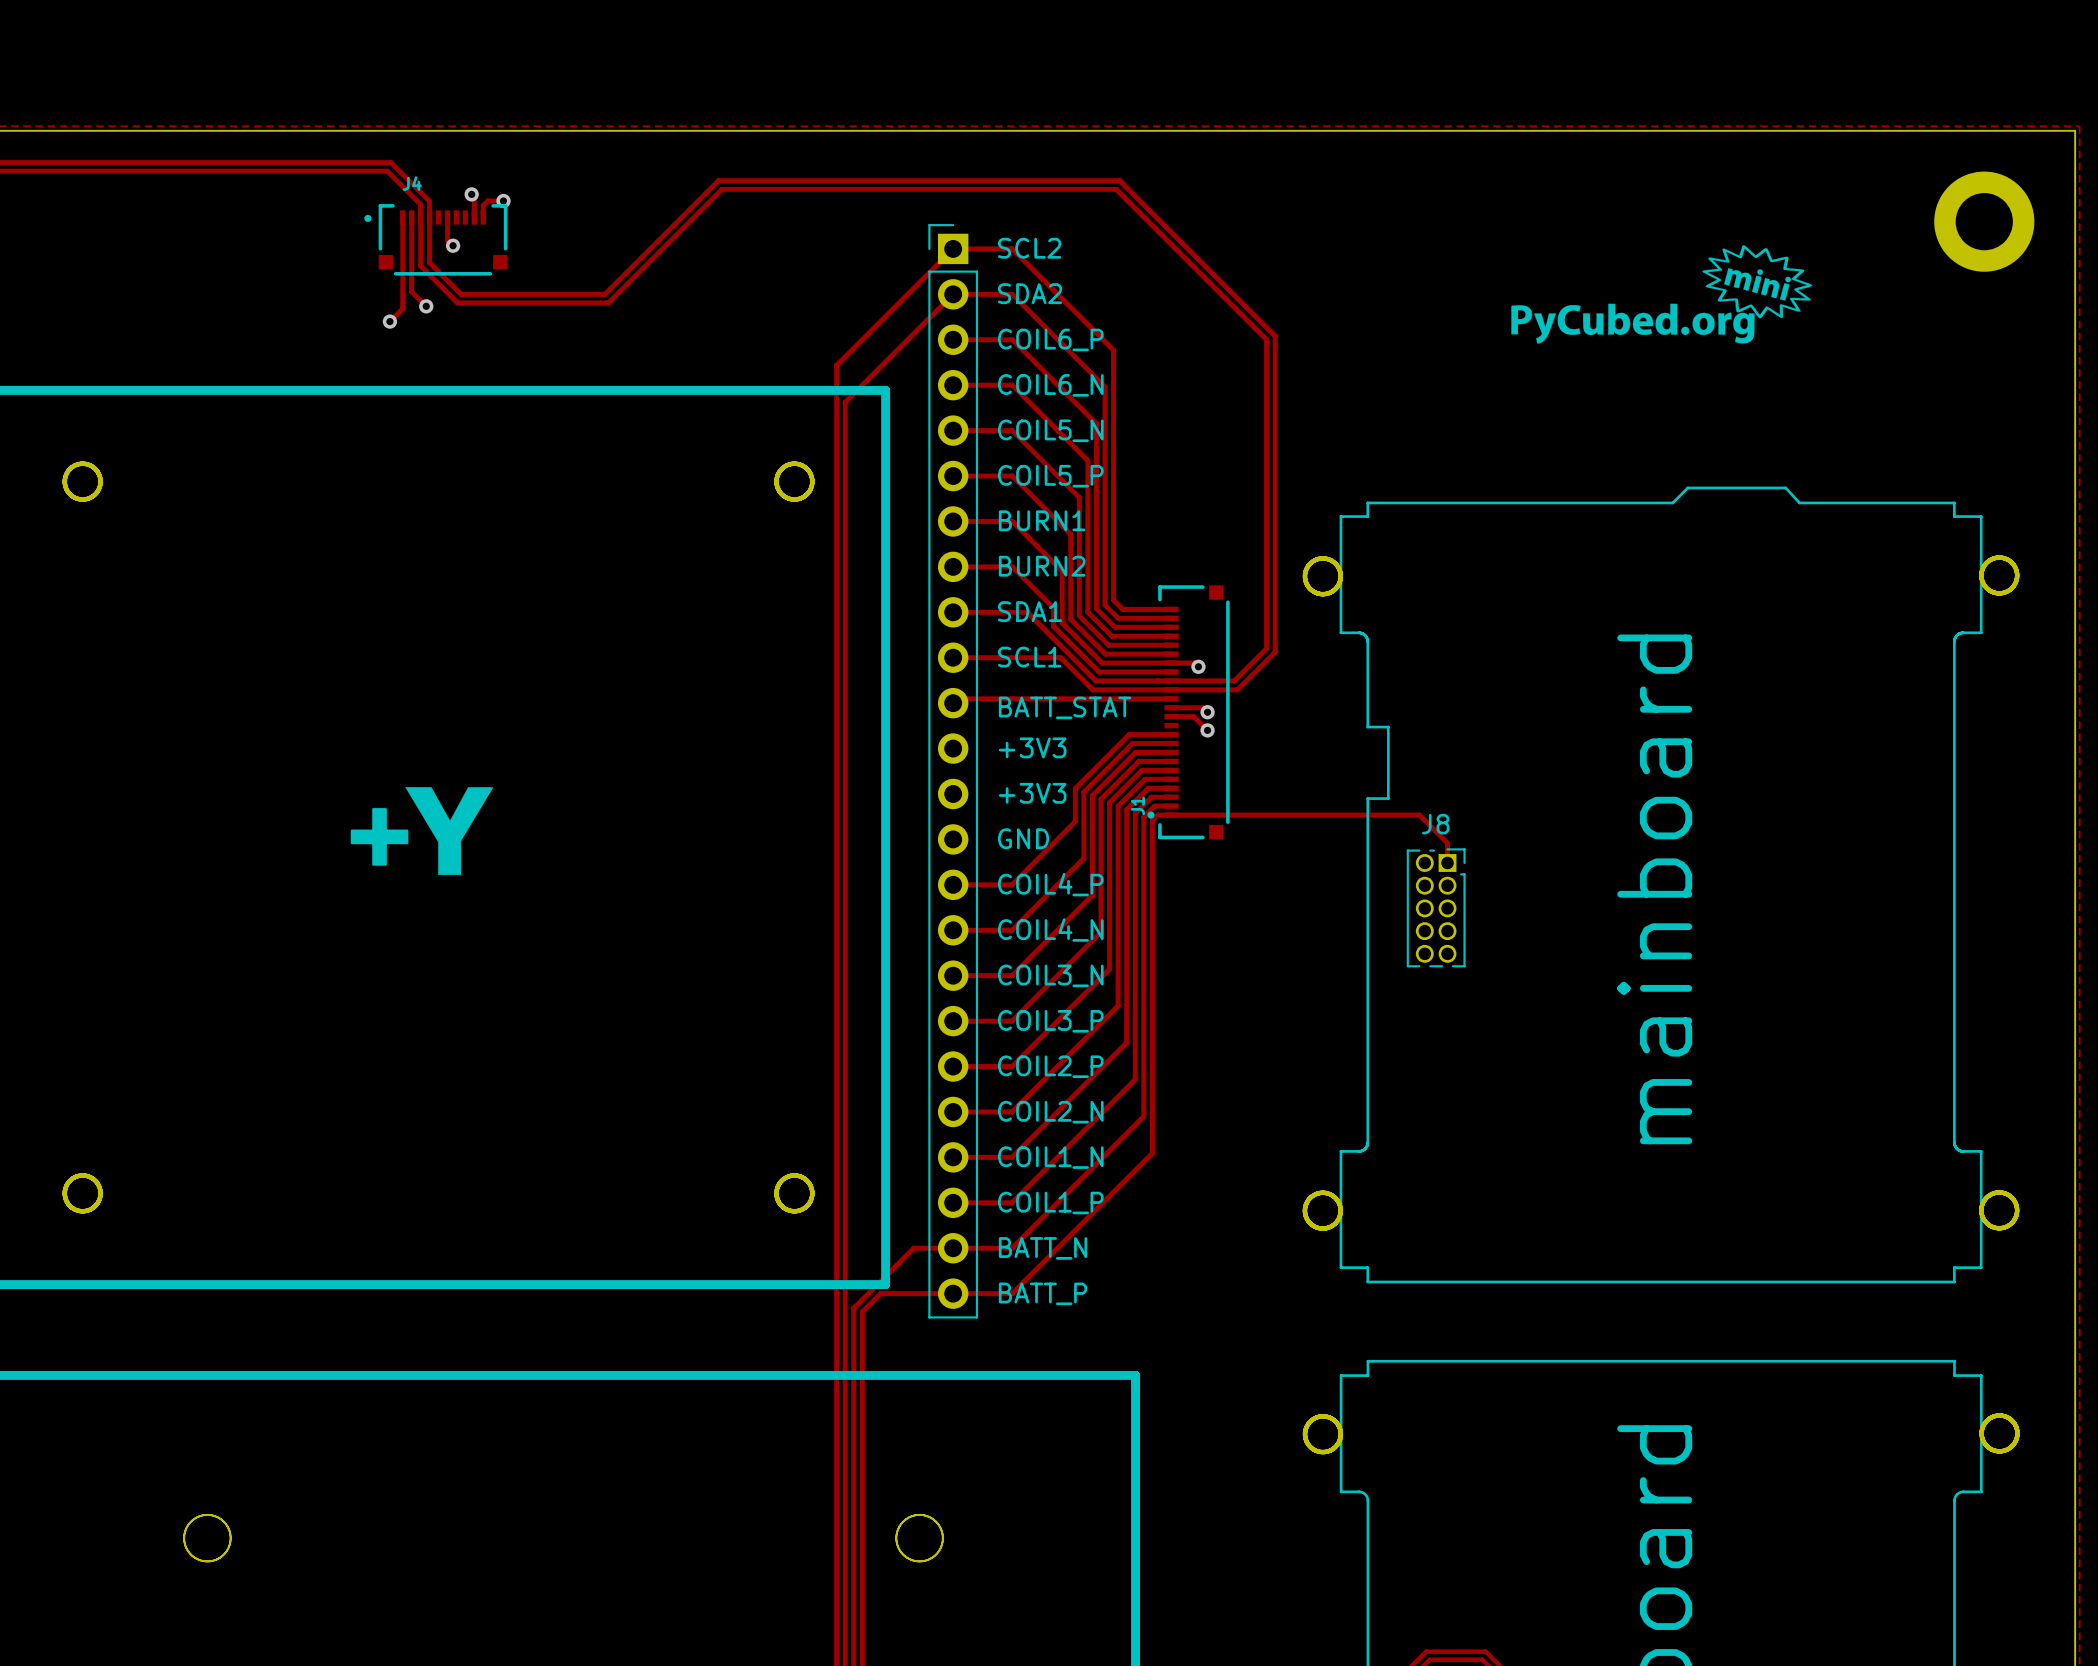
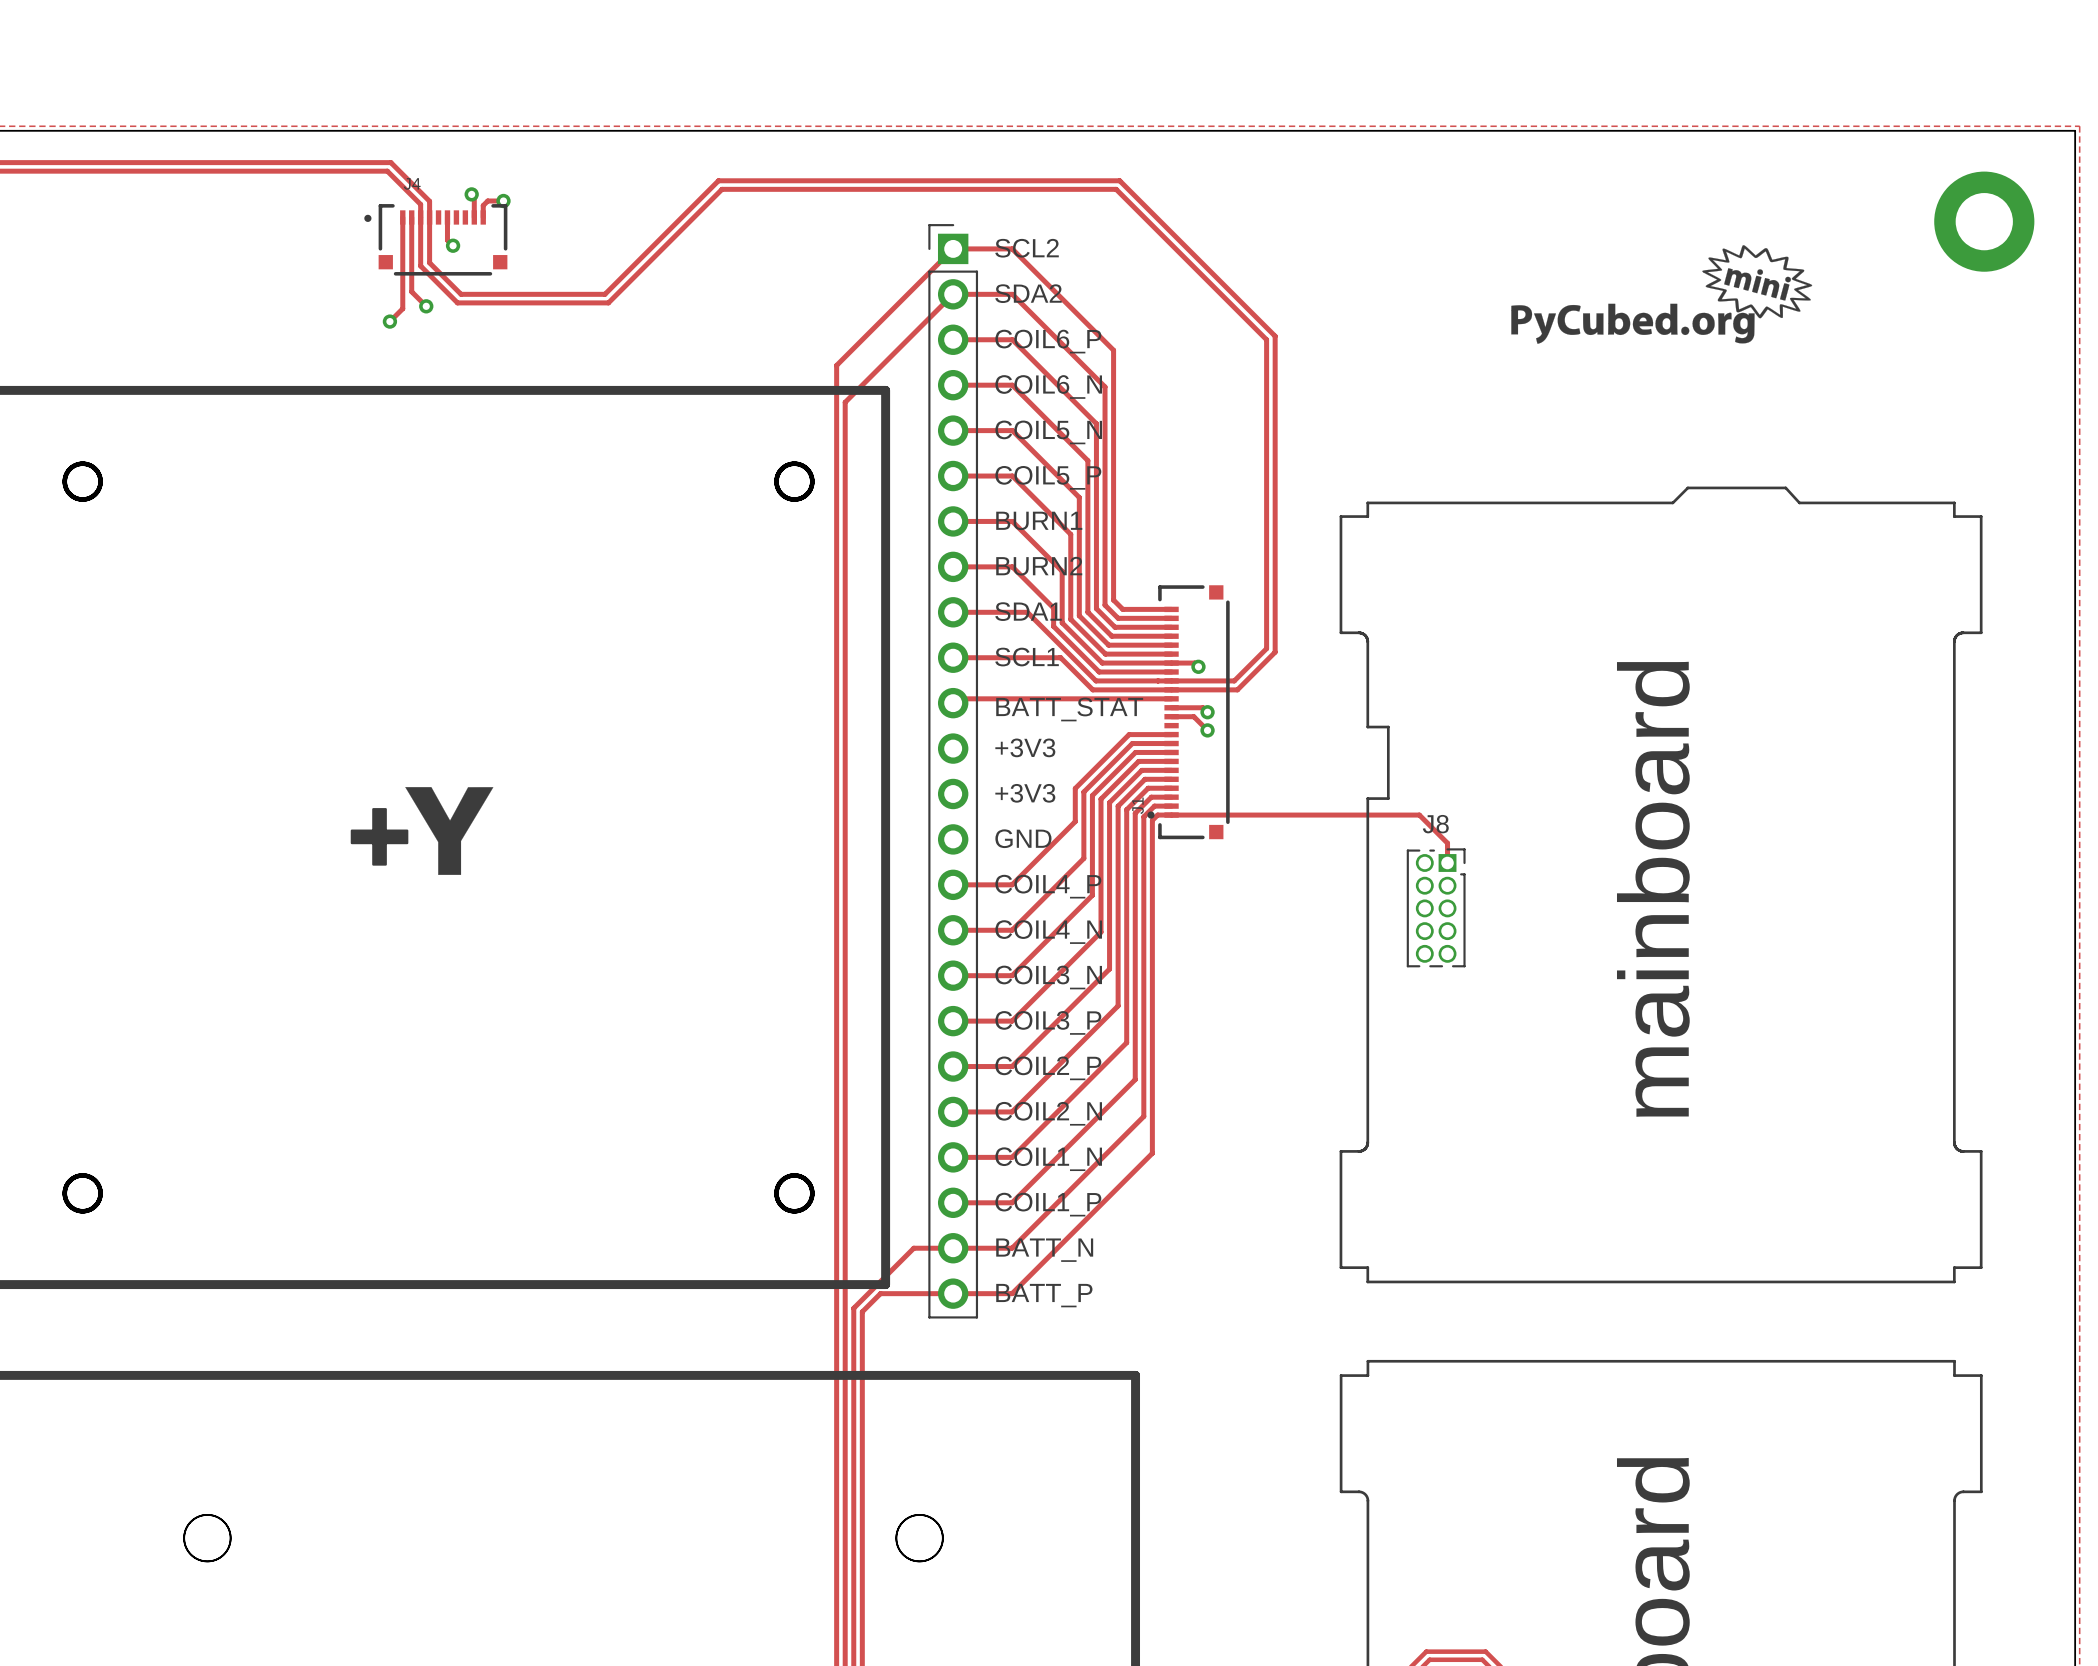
board edge: (1997, 557) (1985, 564) (1981, 577) (1987, 589) (2001, 593) (2013, 586) (2017, 573) (2010, 561) (1997, 557) -> none
board edge: (1321, 558) (1309, 564) (1304, 577) (1310, 589) (1323, 594) (1336, 588) (1340, 575) (1334, 563) (1321, 558) -> none
board edge: (1320, 1192) (1309, 1199) (1305, 1212) (1311, 1224) (1324, 1228) (1336, 1222) (1340, 1208) (1334, 1196) (1320, 1192) -> none
board edge: (1997, 1192) (1985, 1198) (1981, 1212) (1987, 1224) (2001, 1228) (2013, 1221) (2017, 1208) (2010, 1196) (1997, 1192) -> none
board edge: (1998, 1415) (1986, 1421) (1981, 1434) (1987, 1446) (2000, 1451) (2012, 1445) (2017, 1432) (2011, 1420) (1998, 1415) -> none
board edge: (1321, 1416) (1309, 1422) (1305, 1436) (1311, 1448) (1324, 1452) (1336, 1445) (1340, 1432) (1334, 1420) (1321, 1416) -> none

